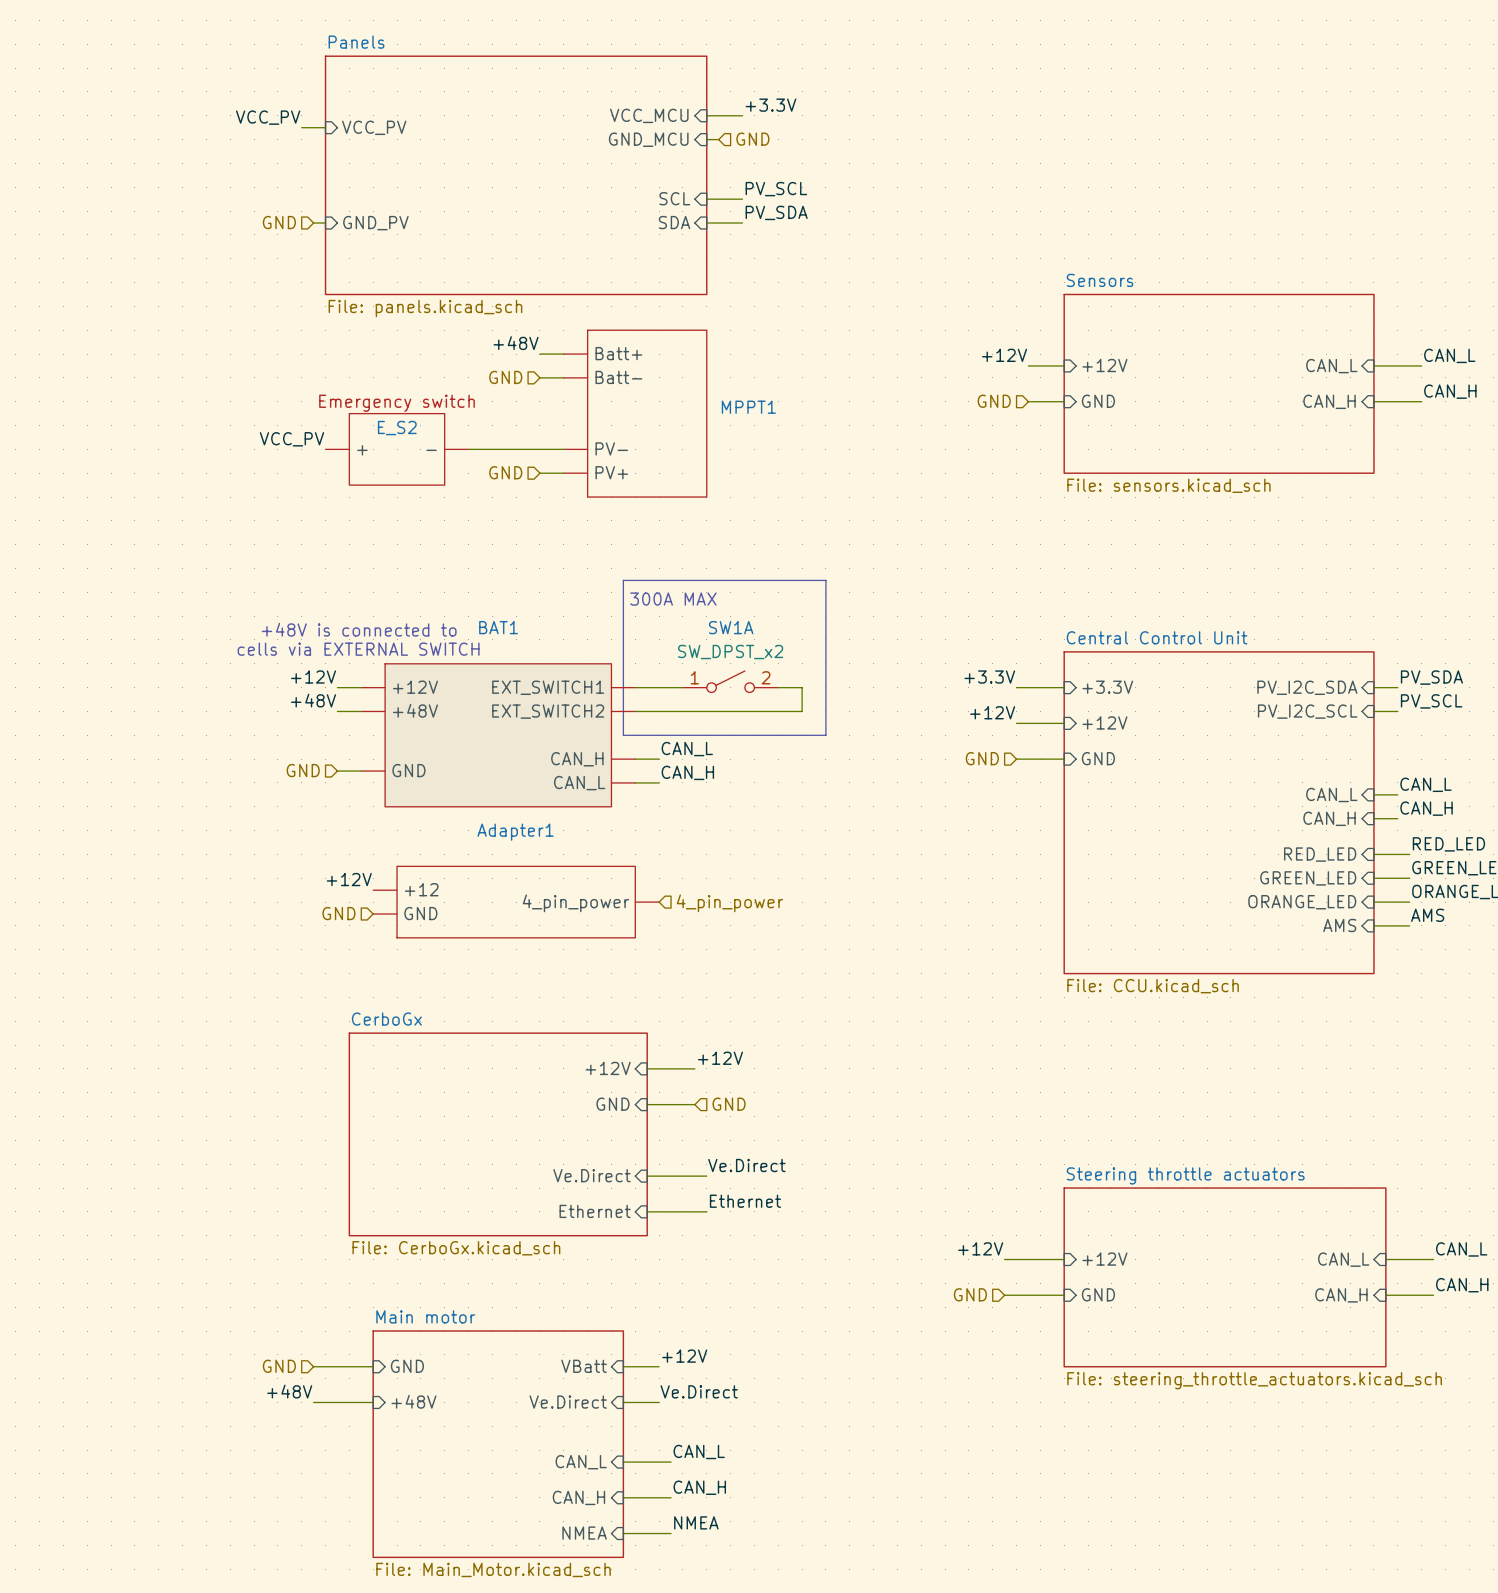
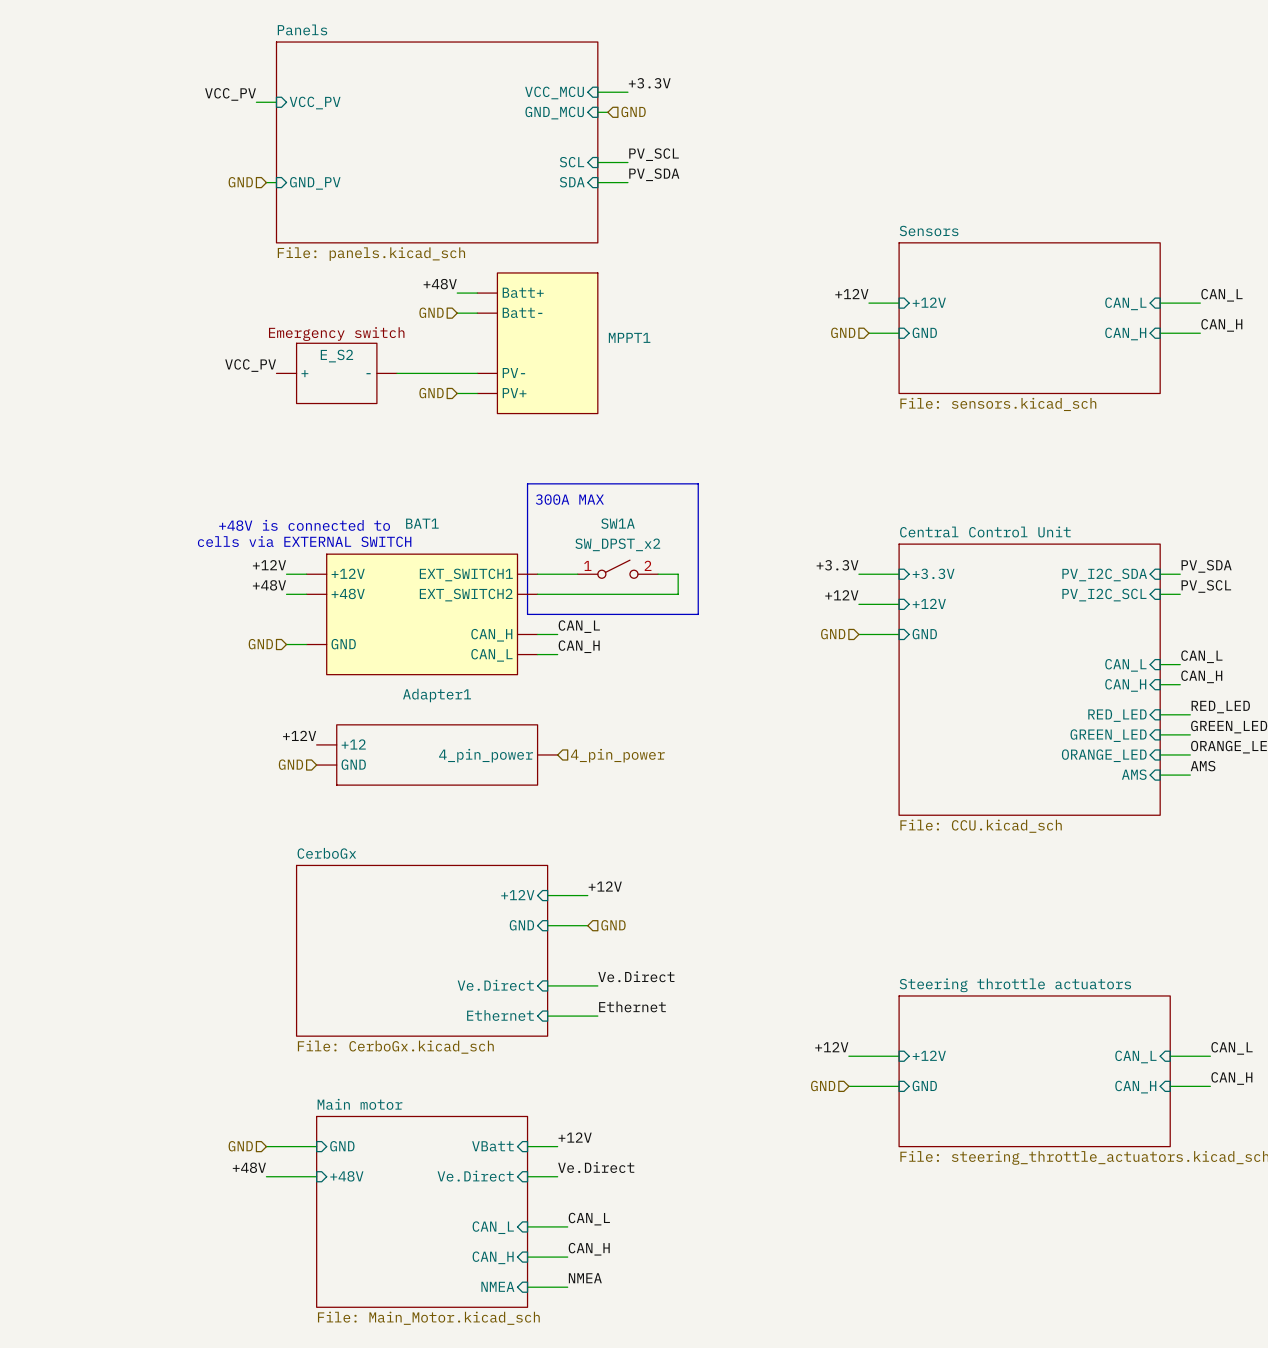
MPPT1 symbol: [563, 330, 707, 498] -> [477, 272, 598, 414]

